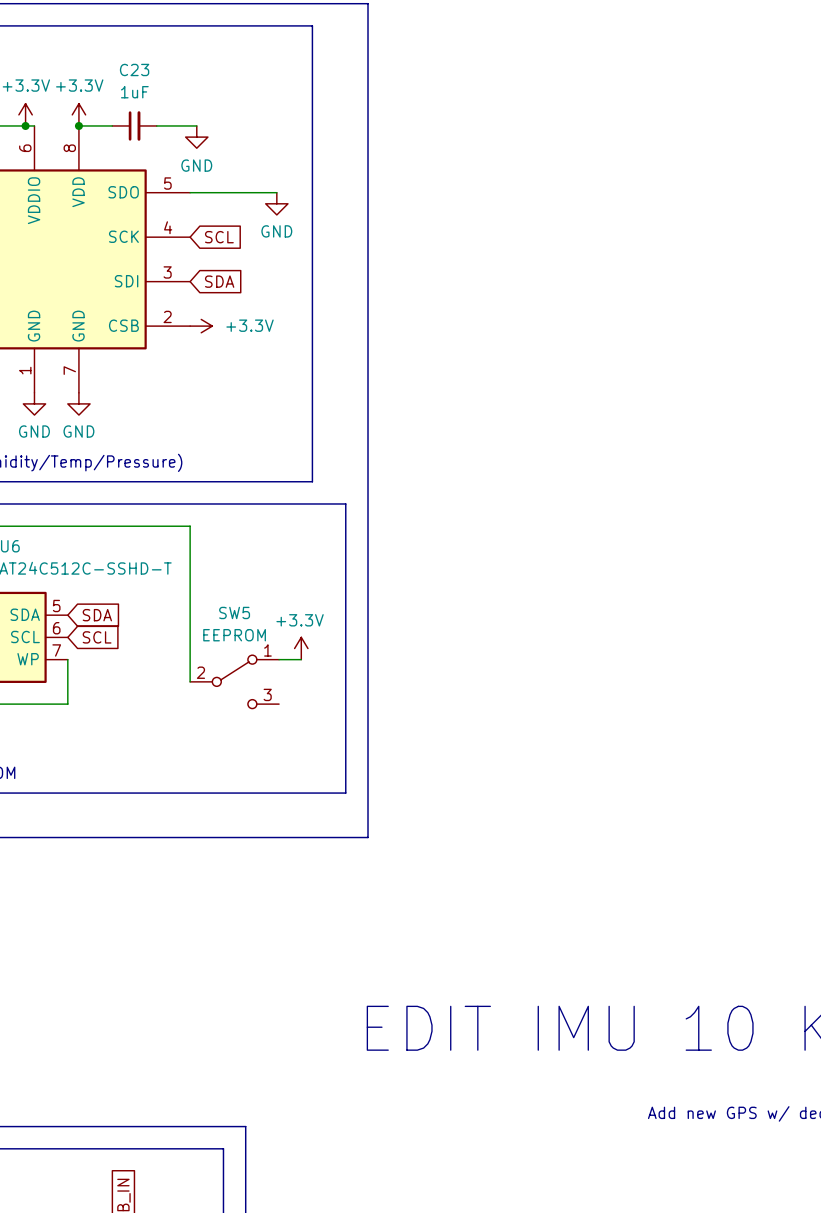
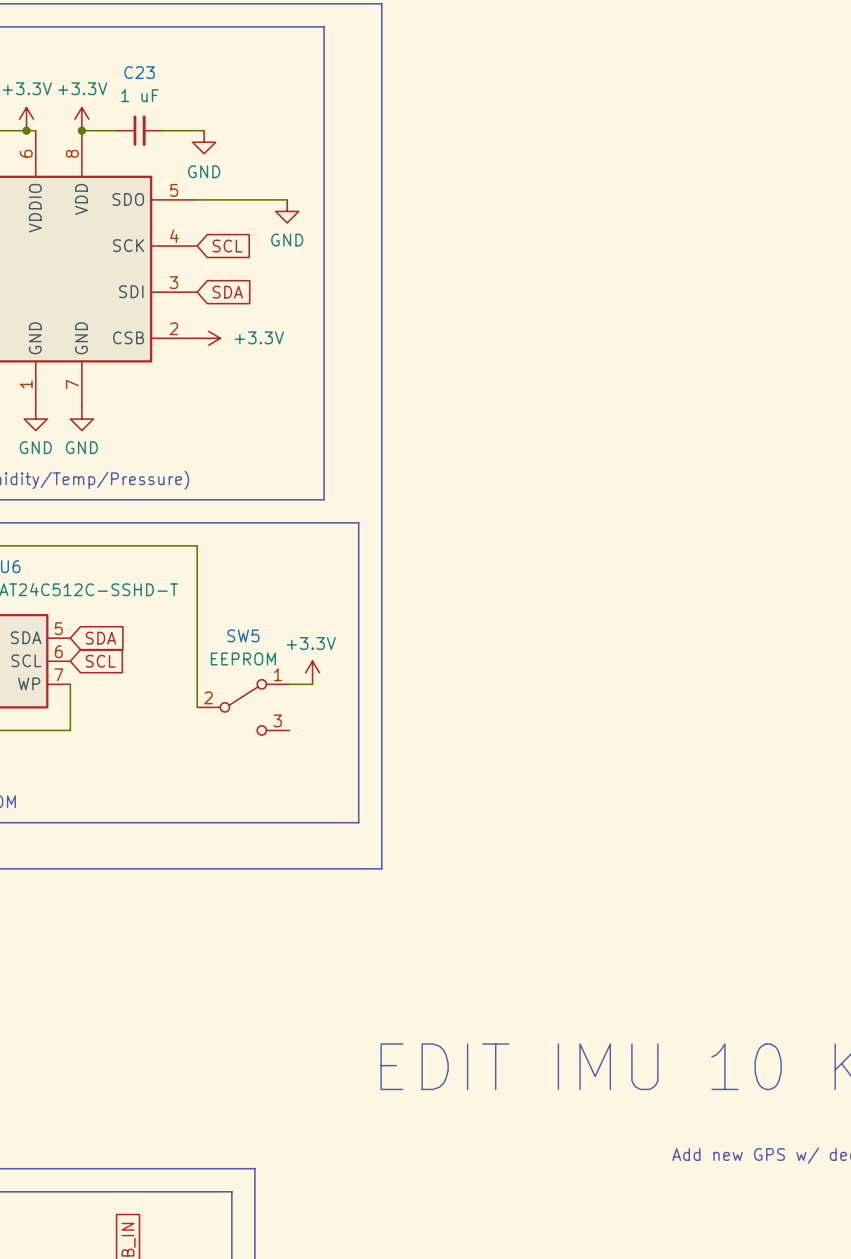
C23 value: 1uF (134, 92) -> 1 uF (139, 95)

